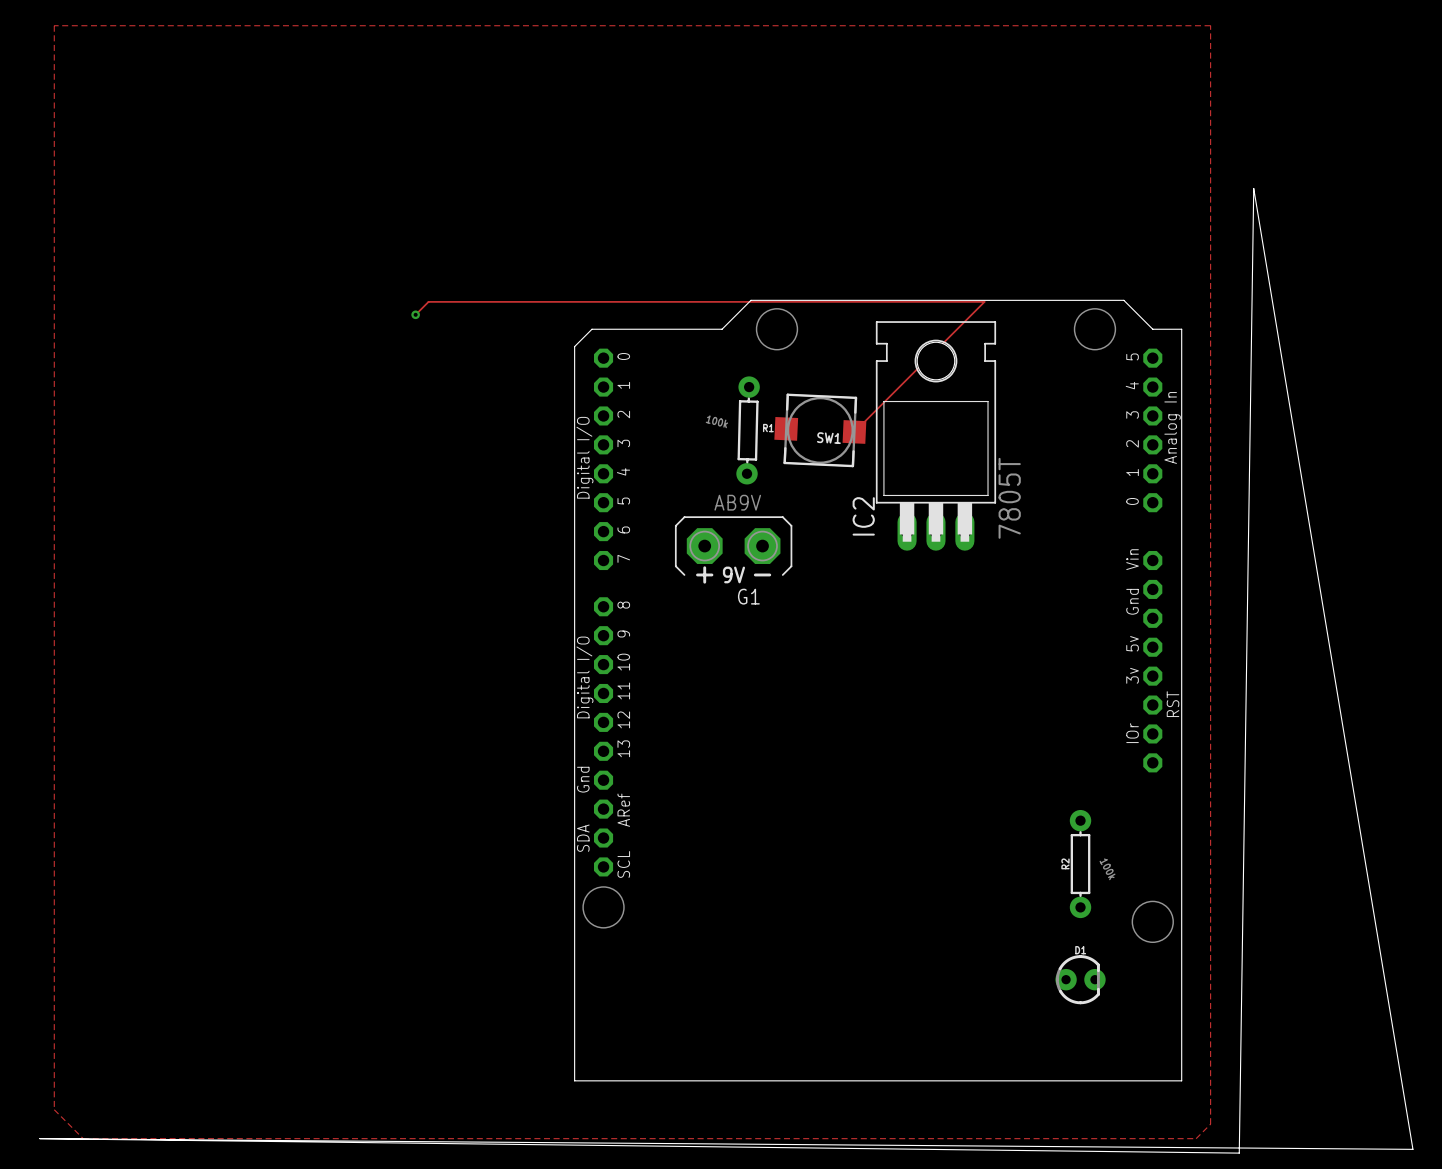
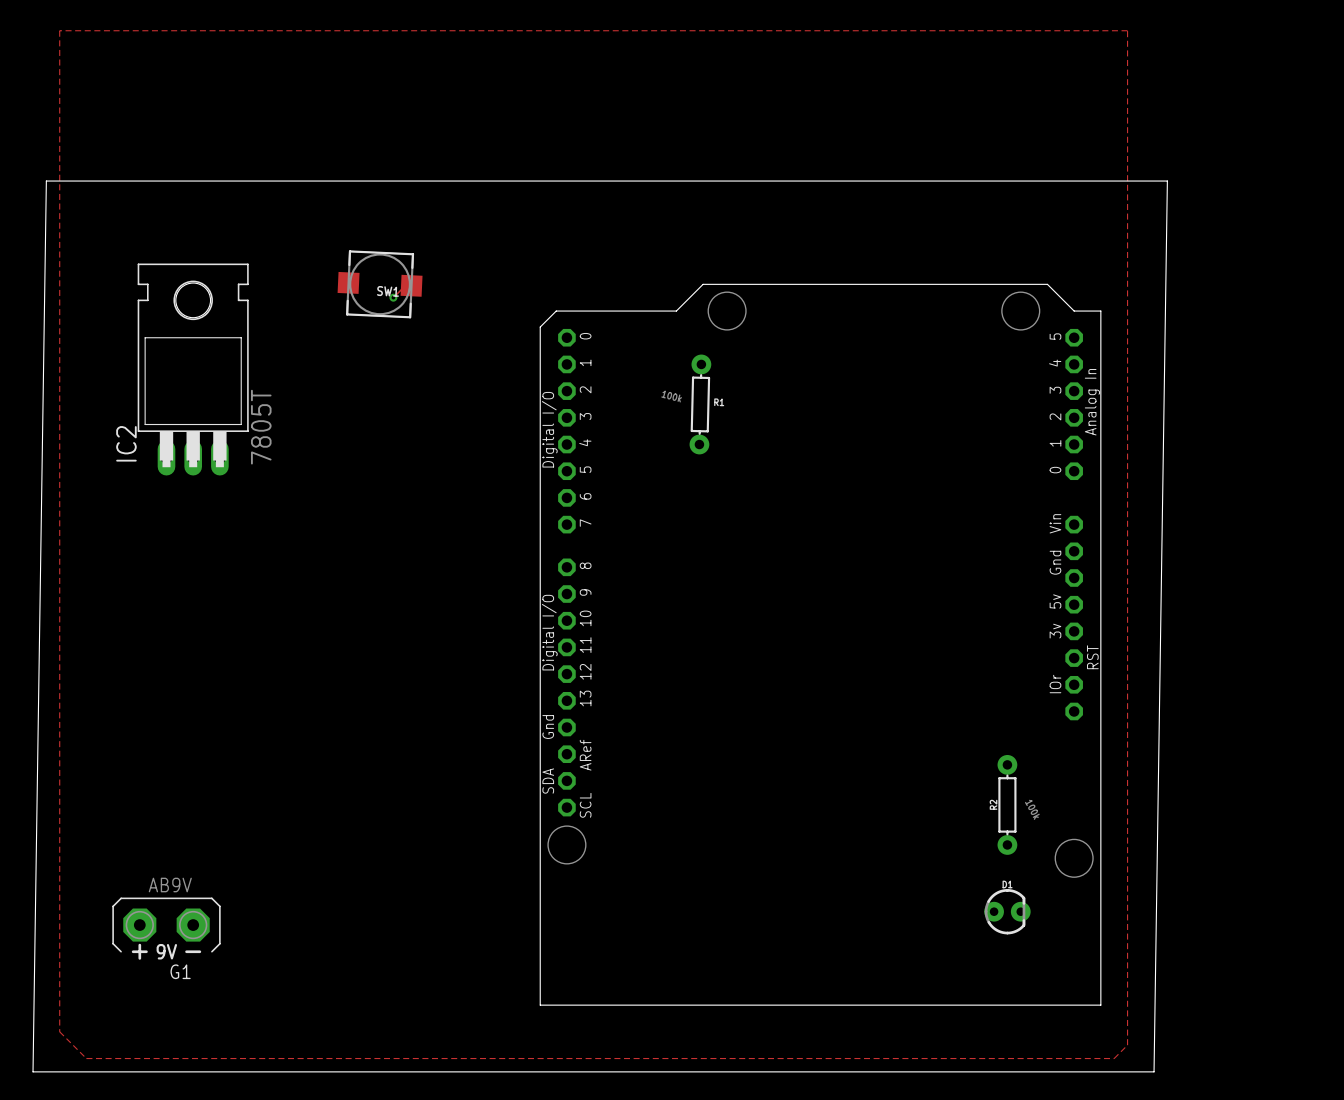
board edge: (1253, 188) (1412, 1149) (39, 1138) (1239, 1153) -> (1167, 181) (46, 181) (33, 1071) (1154, 1071)
track: (435, 301) (984, 301) (854, 431) -> none
SW1 position: (820, 430) -> (380, 284)
IC2 position: (935, 435) -> (193, 369)
G1 position: (733, 549) -> (166, 928)

